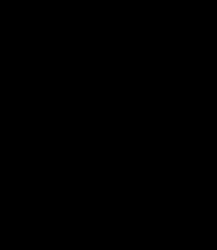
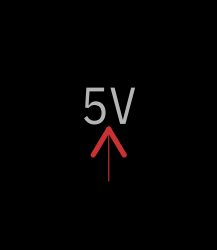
power symbol: none -> 5V (108, 153)

